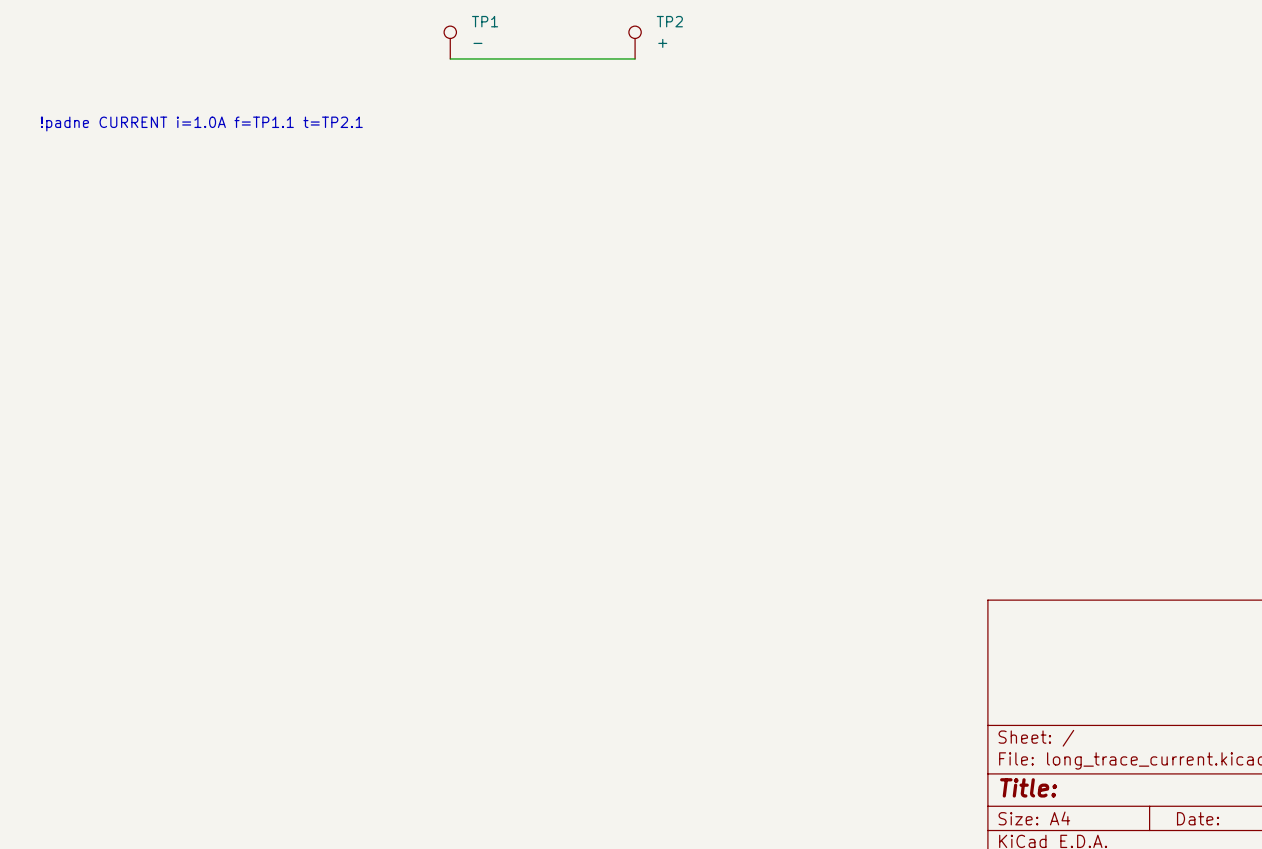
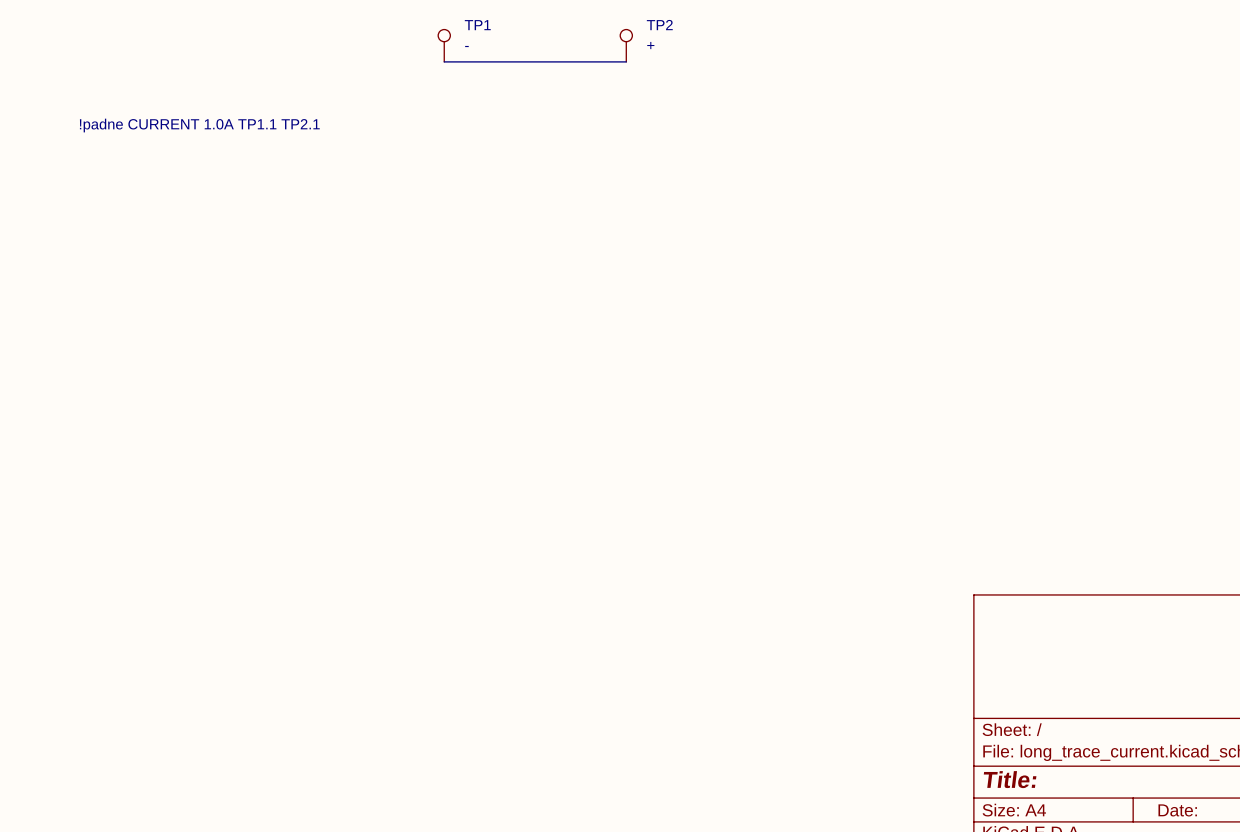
text: !padne CURRENT i=1.0A f=TP1.1 t=TP2.1 (201, 124) -> !padne CURRENT 1.0A TP1.1 TP2.1 (199, 125)

